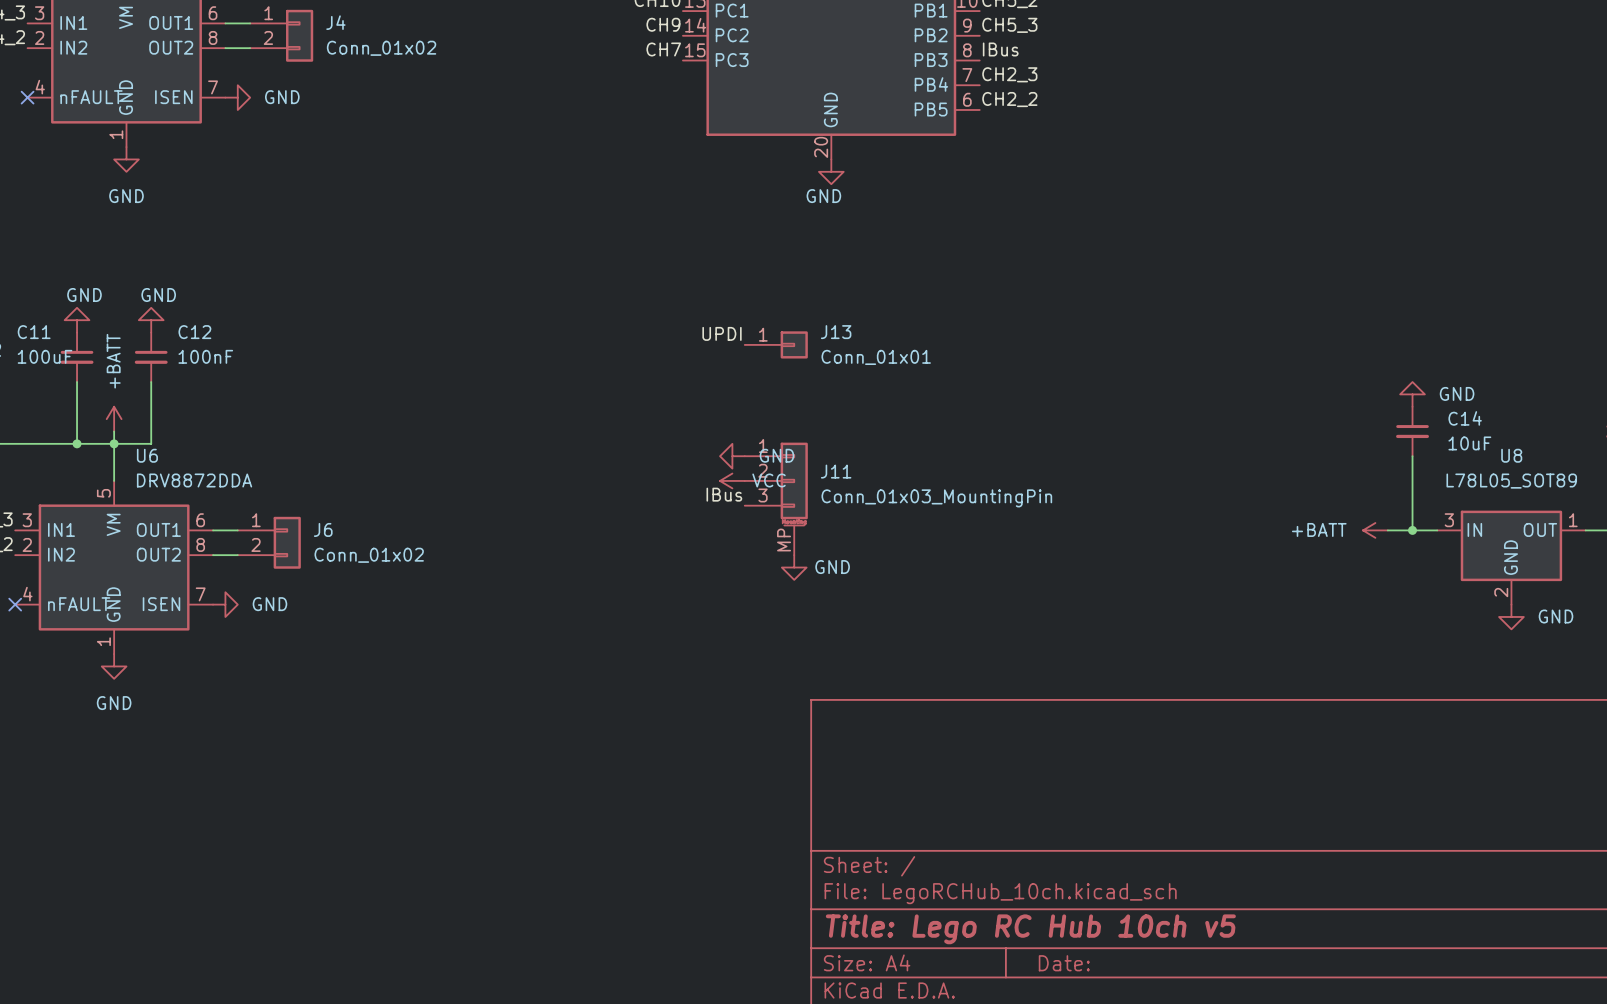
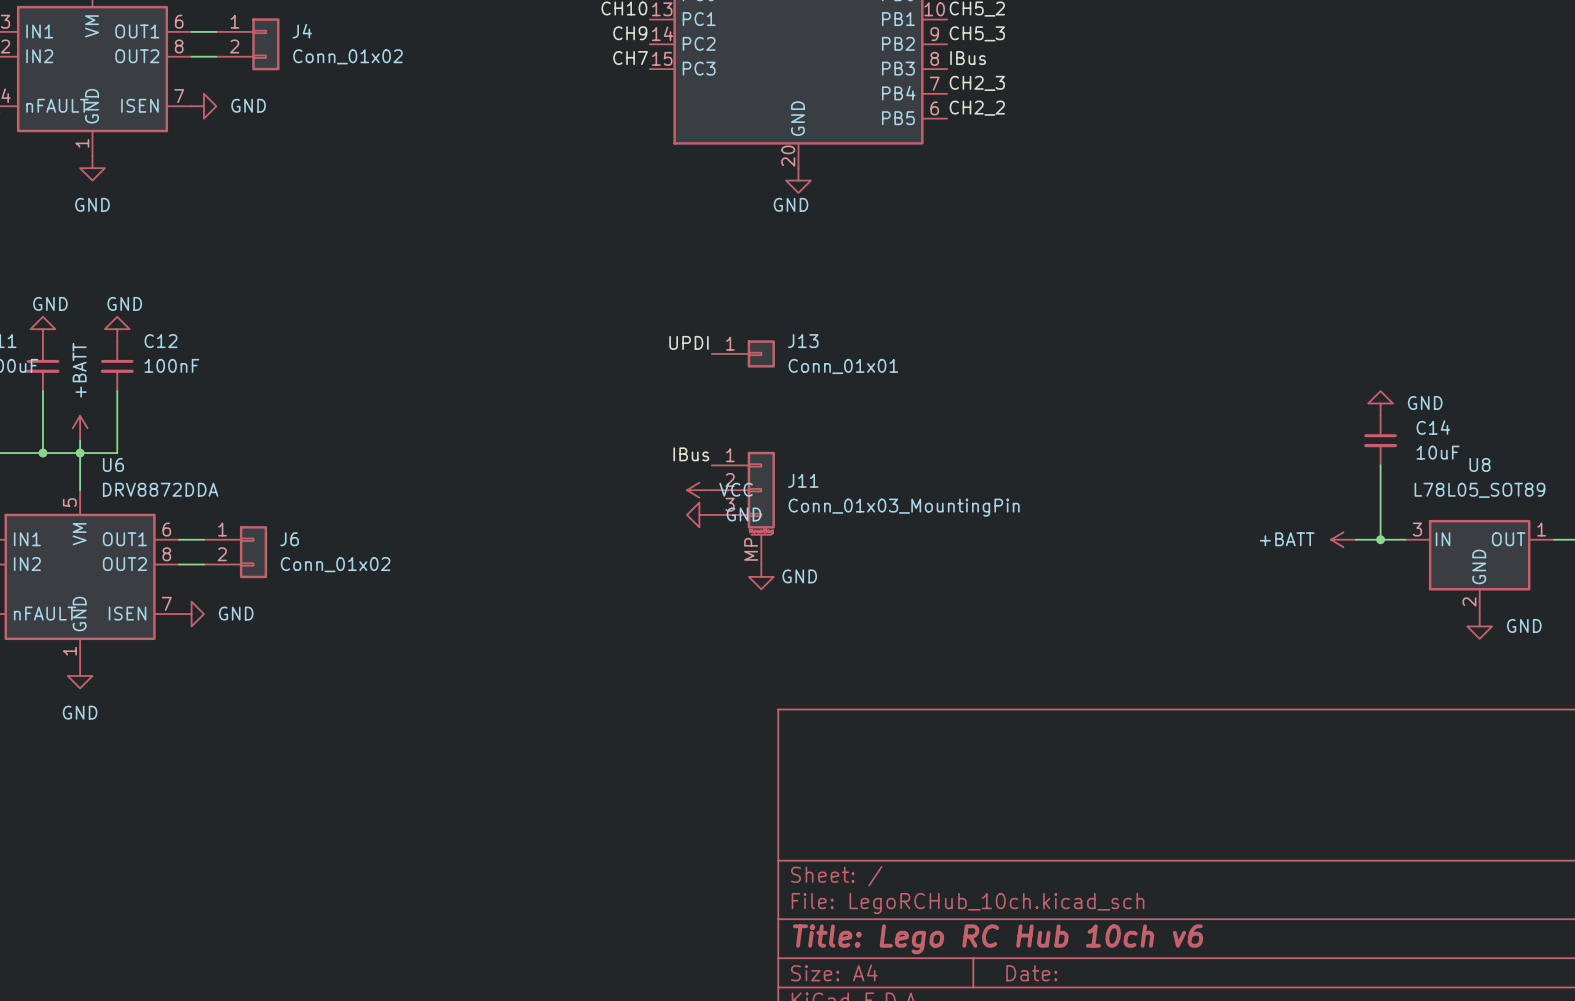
power symbol position: GND (732, 456) -> GND (699, 514)
label position: IBus (724, 494) -> IBus (691, 454)
title block: Title: Lego RC Hub 10ch v5 (1030, 929) -> Title: Lego RC Hub 10ch v6 (998, 939)

